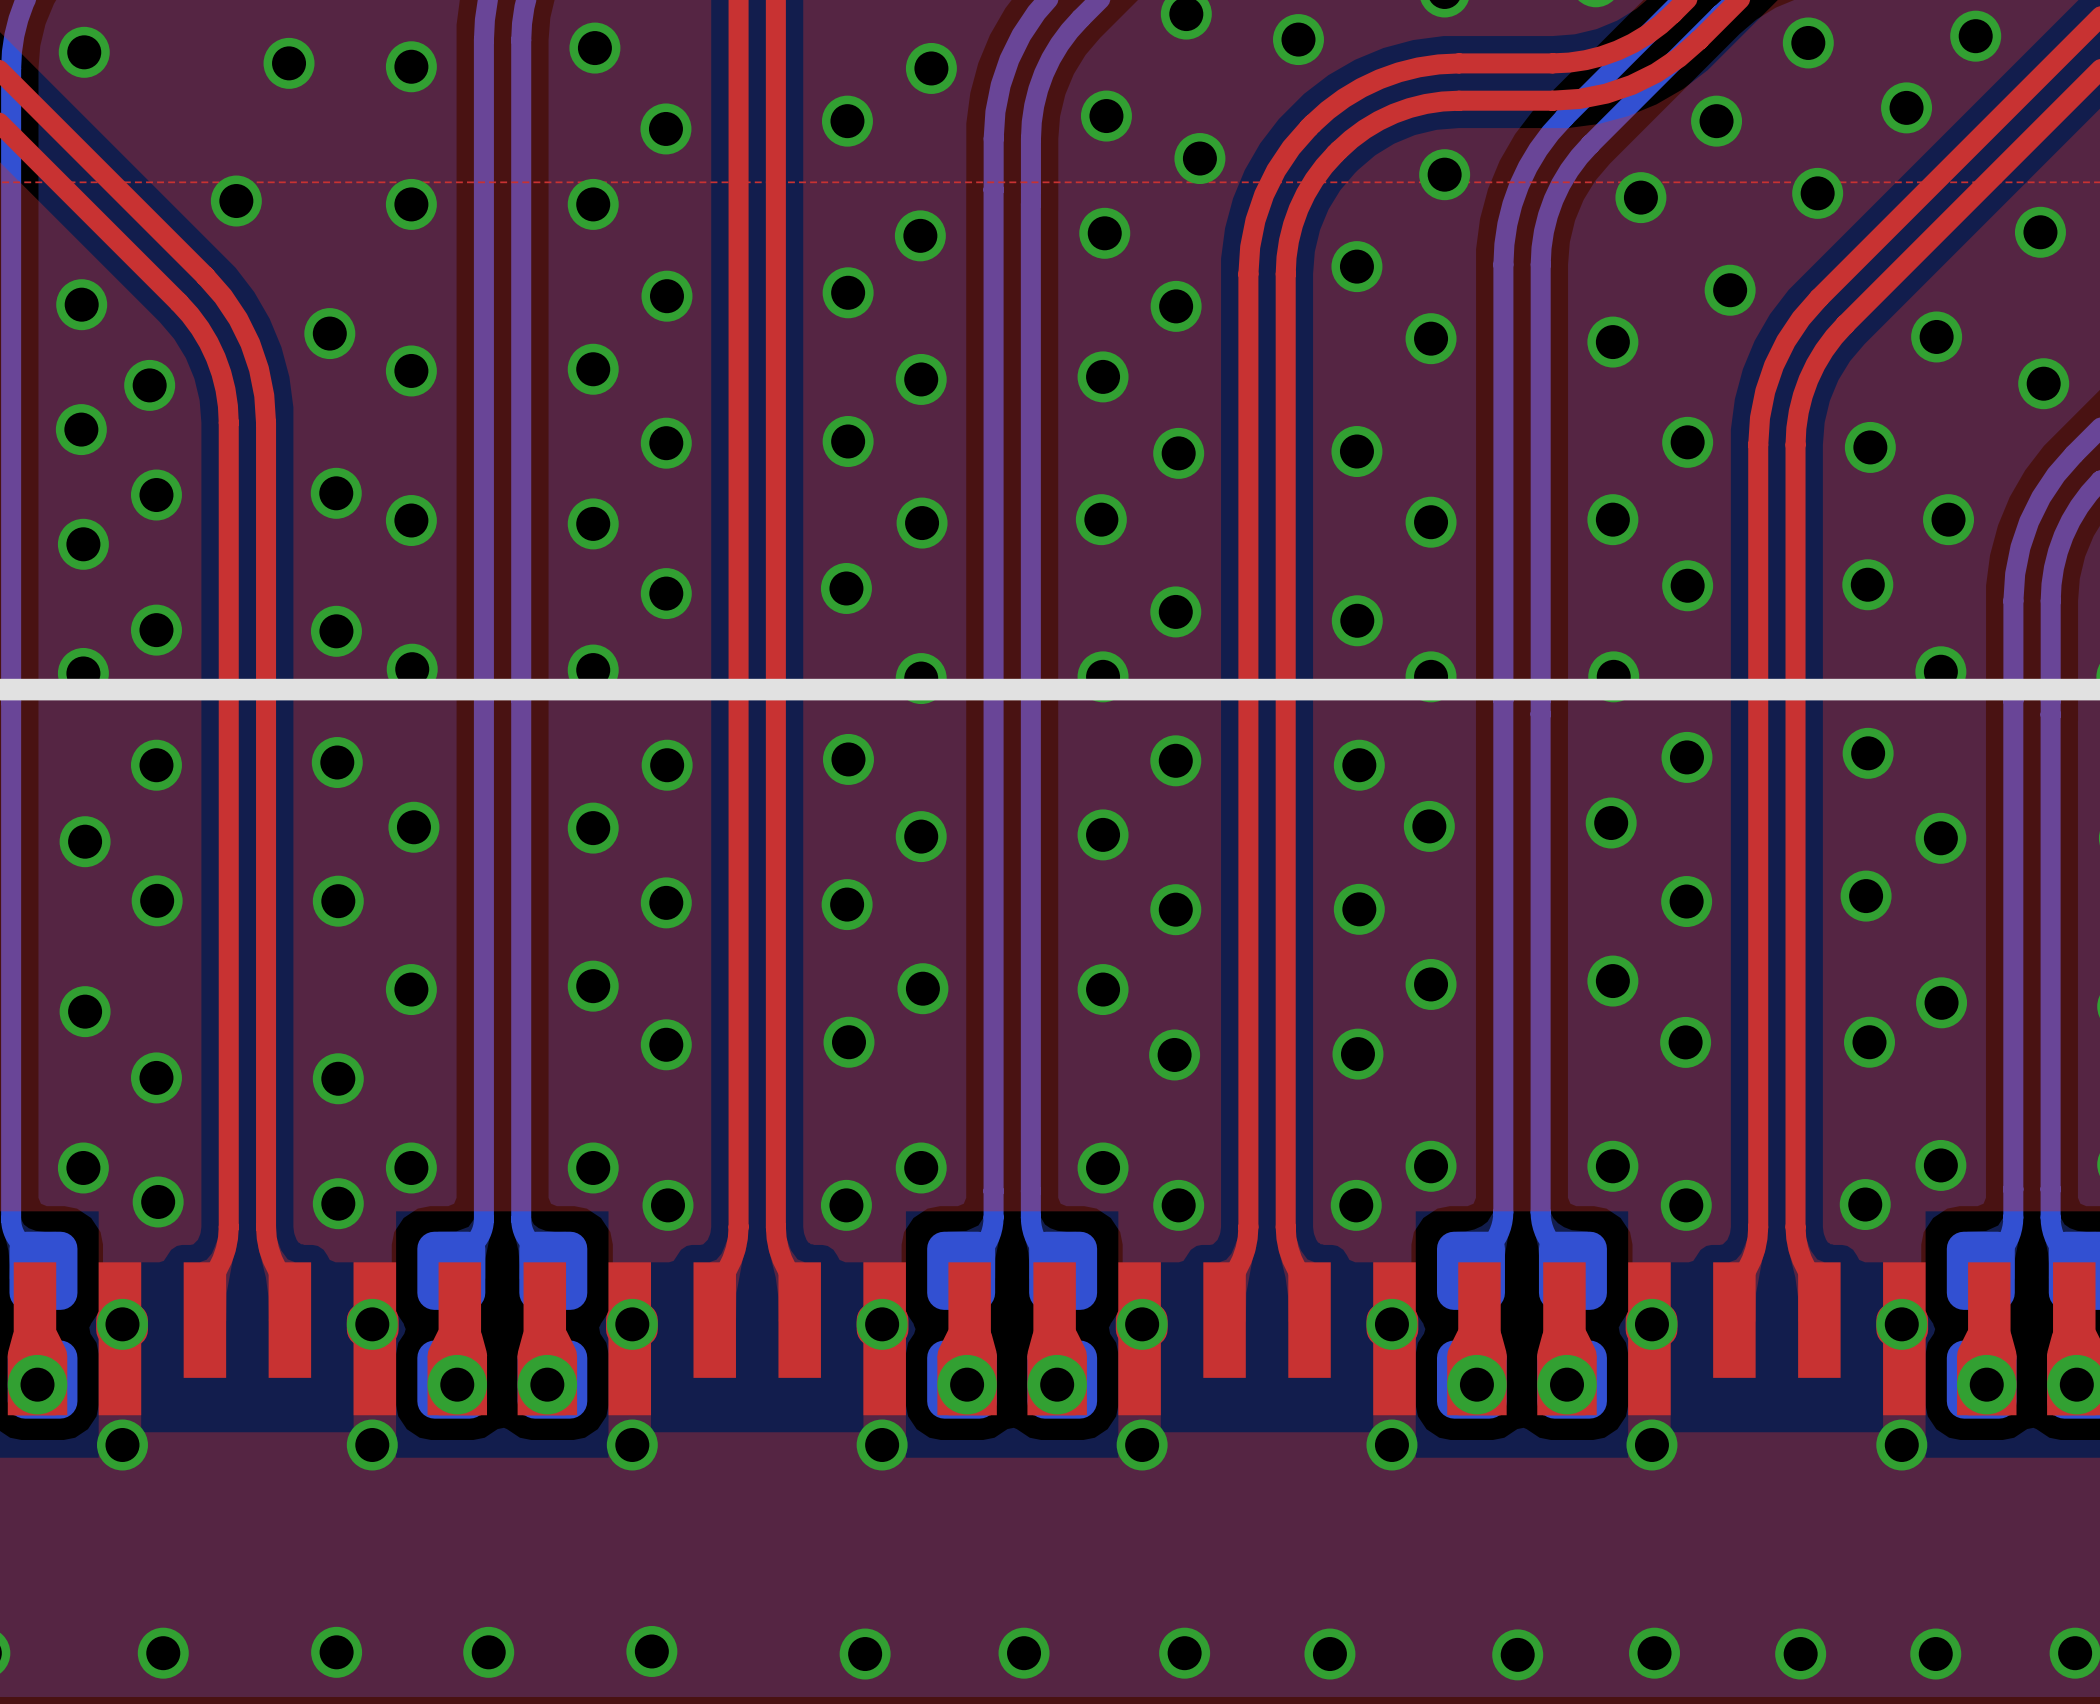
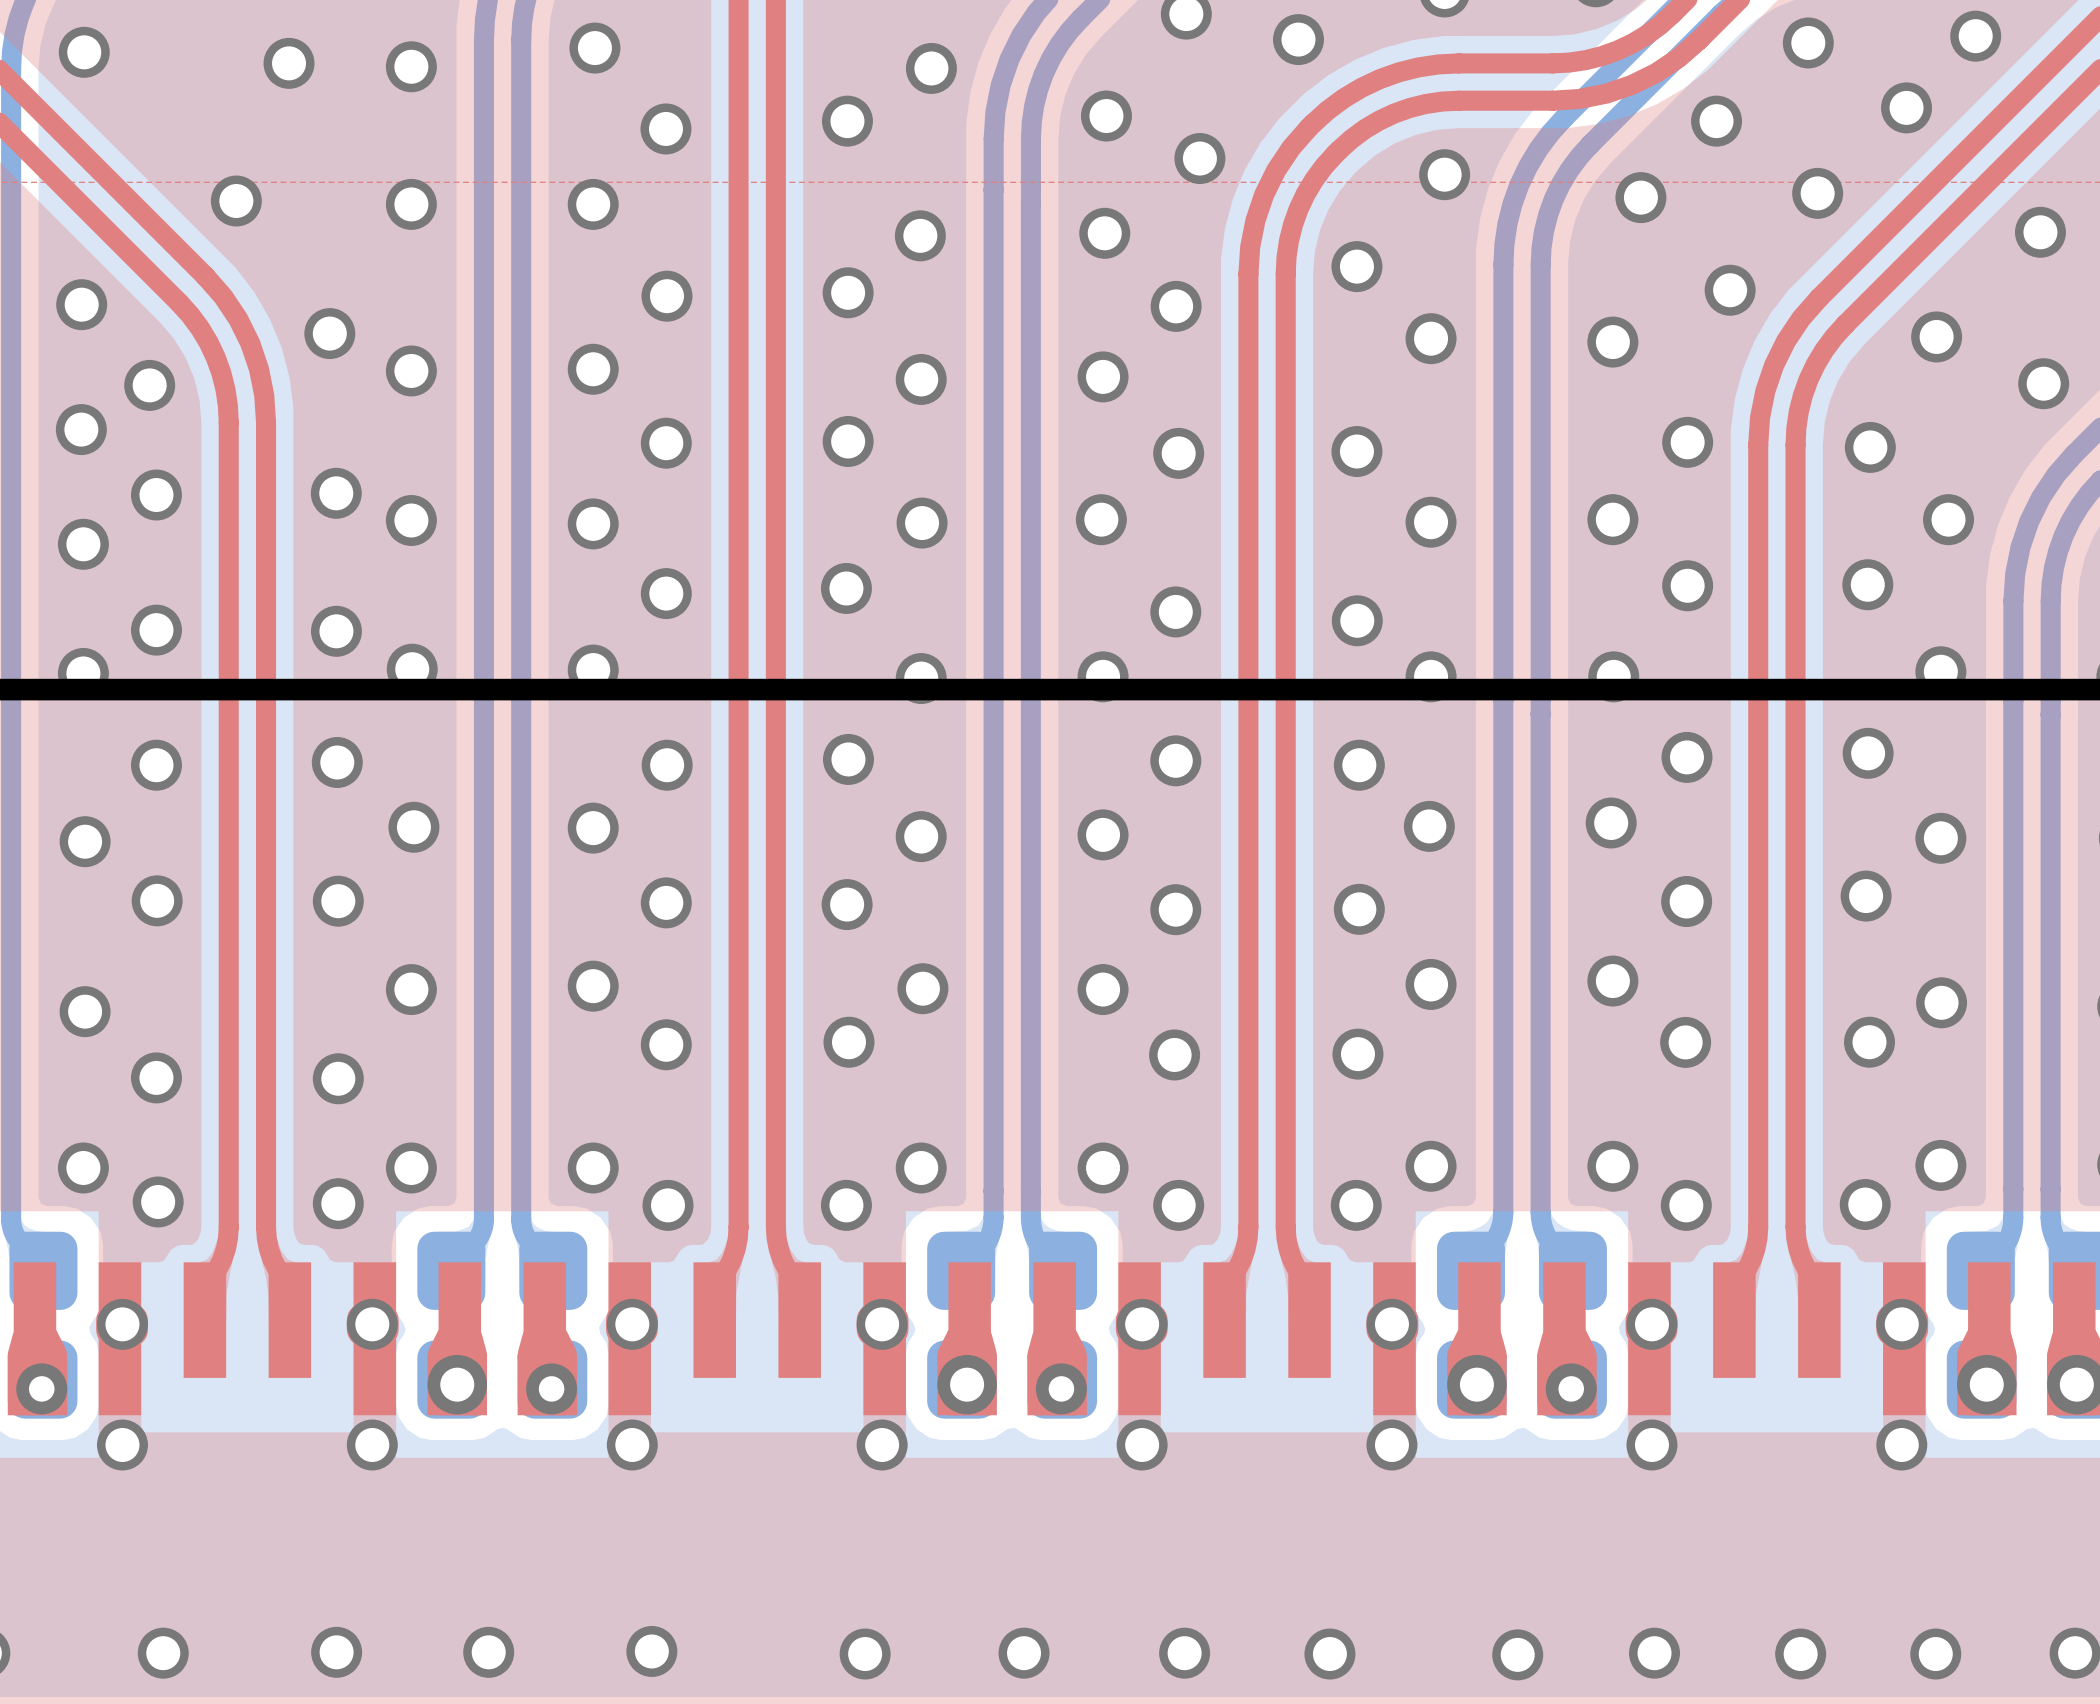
via size: [7, 1354, 68, 1415] -> [16, 1363, 68, 1415]
via size: [517, 1354, 578, 1415] -> [526, 1363, 578, 1415]
via size: [1027, 1354, 1087, 1415] -> [1035, 1363, 1087, 1415]
via size: [1537, 1354, 1597, 1415] -> [1545, 1363, 1597, 1415]

